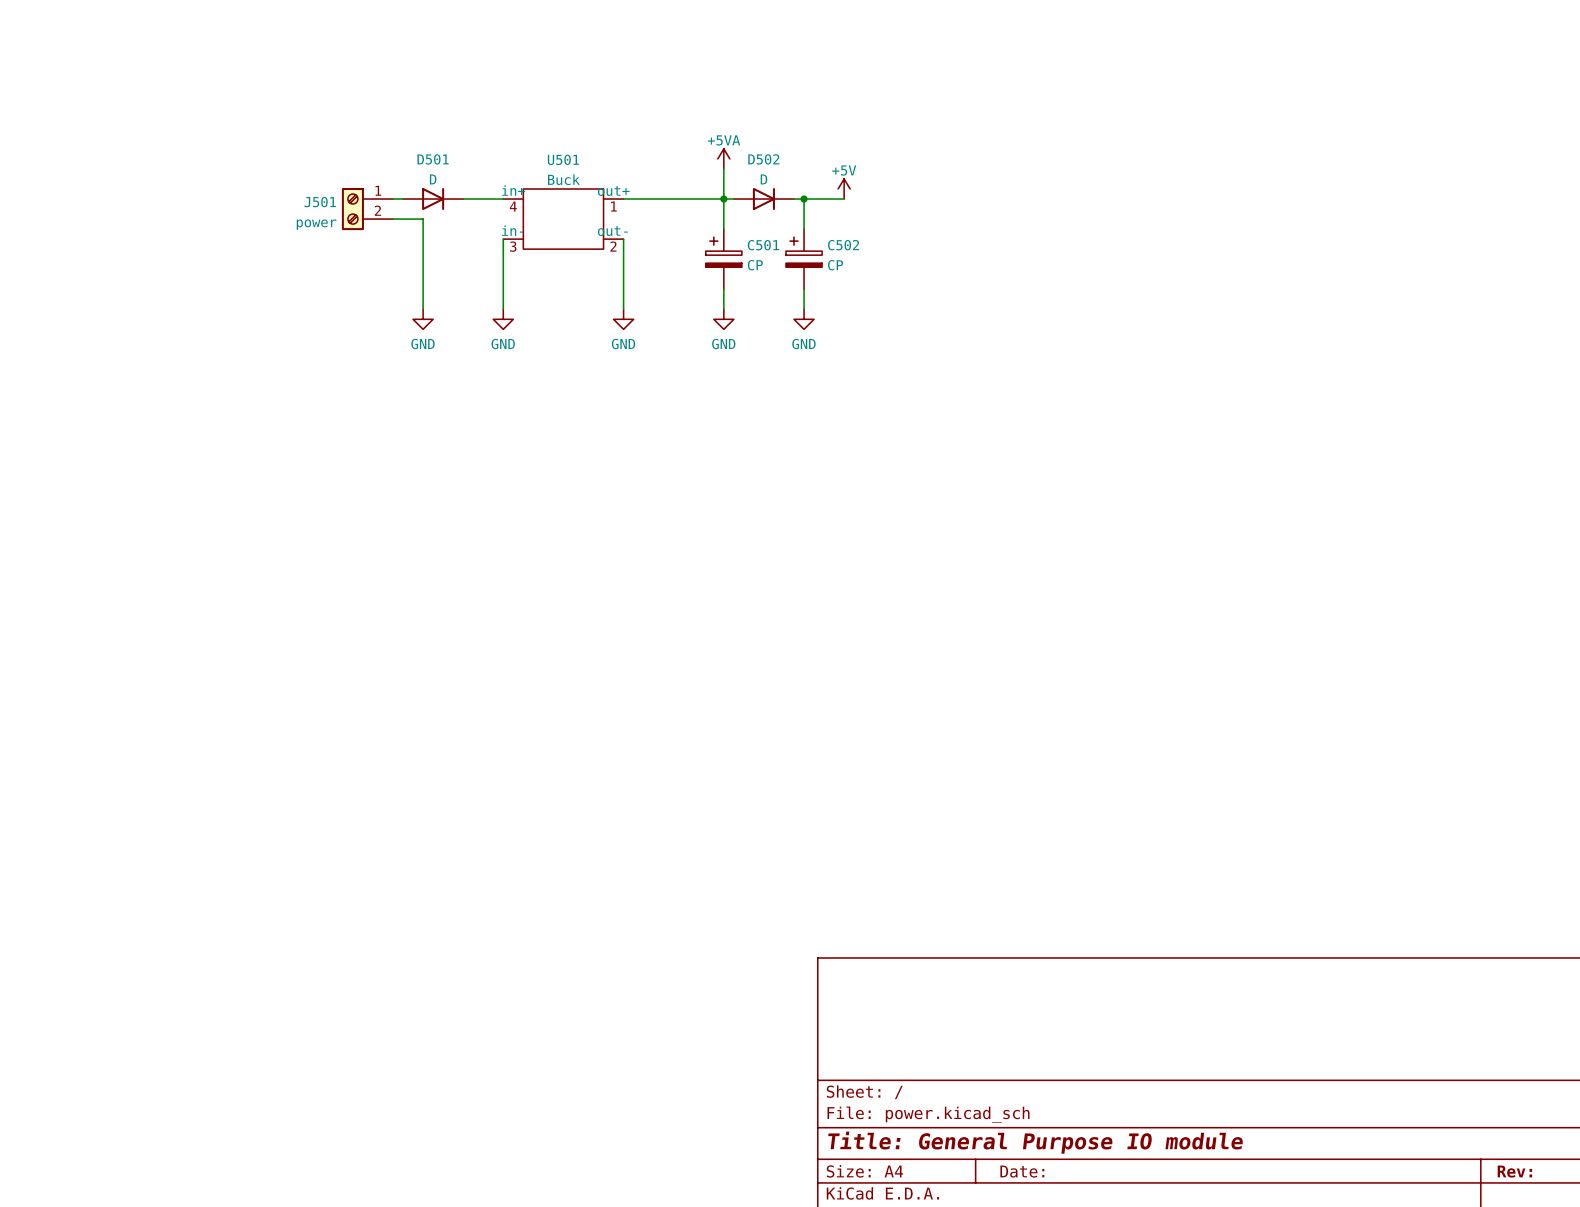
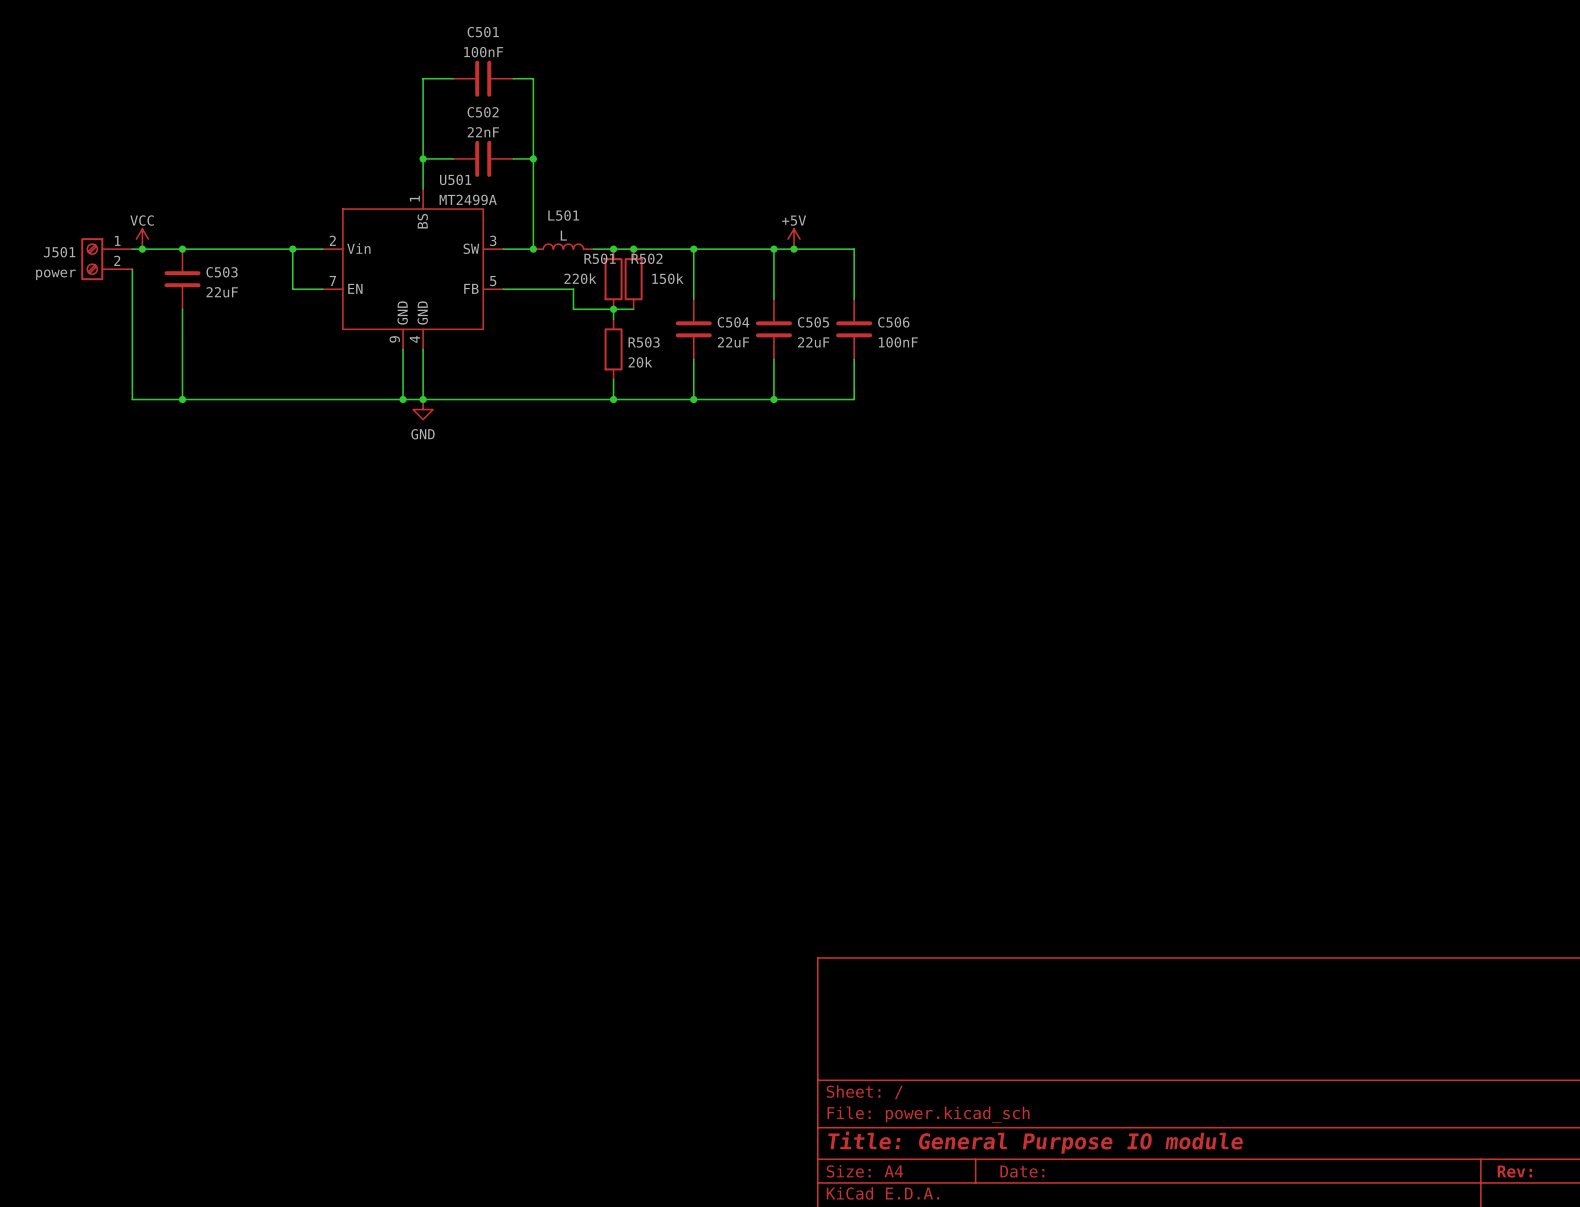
wire: none -> (453, 78) (423, 78) (423, 188)
wire: none -> (513, 78) (533, 78) (533, 249) (503, 249)
wire: none -> (423, 158) (453, 158)
junction: none -> (423, 158)
wire: none -> (513, 158) (533, 158)
junction: none -> (533, 158)
power symbol: +5VA (723, 158) -> none
U501 name position: U501 (563, 159) -> U501 (455, 179)
wire: (723, 168) (723, 229) -> none
U501 value: Buck (563, 179) -> MT2499A (468, 199)
U501 symbol: [503, 188, 624, 250] -> [322, 188, 504, 350]
power symbol position: +5V (844, 188) -> +5V (794, 239)
wire: (393, 199) (403, 199) -> none
D501: D (433, 199) -> none
wire: (463, 199) (503, 199) -> none
wire: (623, 199) (733, 199) -> none
junction: (723, 199) -> none
D502: D (763, 199) -> none
wire: (794, 199) (844, 199) -> none
wire: (804, 199) (804, 229) -> none
junction: (804, 199) -> none
J501 position: (367, 209) -> (106, 259)
wire: (393, 219) (423, 219) (423, 309) -> none
C501 symbol: [705, 229, 742, 290] -> [453, 60, 514, 97]
C502 symbol: [785, 229, 823, 290] -> [453, 140, 514, 177]
power symbol: none -> VCC (142, 239)
wire: (503, 239) (503, 309) -> none
wire: (623, 239) (623, 309) -> none
C501 name position: C501 (763, 245) -> C501 (483, 32)
C502 name position: C502 (843, 245) -> C502 (483, 112)
L501: none -> L (563, 246)
wire: none -> (132, 249) (322, 249)
junction: none -> (142, 249)
junction: none -> (182, 249)
wire: none -> (292, 249) (292, 289) (322, 289)
junction: none -> (292, 249)
junction: none -> (533, 249)
wire: none -> (593, 249) (854, 249) (854, 299)
junction: none -> (613, 249)
junction: none -> (633, 249)
wire: none -> (693, 249) (693, 299)
junction: none -> (693, 249)
wire: none -> (773, 249) (773, 299)
junction: none -> (773, 249)
junction: none -> (794, 249)
C501 value: CP (755, 265) -> 100nF (483, 52)
C502 value: CP (835, 265) -> 22nF (483, 132)
wire: none -> (132, 269) (132, 399) (854, 399) (854, 359)
C503: none -> 22uF (182, 279)
R501: none -> 220k (613, 279)
R502: none -> 150k (633, 279)
wire: none -> (503, 289) (573, 289) (573, 309) (633, 309)
wire: (723, 289) (723, 309) -> (613, 379) (613, 399)
wire: (804, 289) (804, 309) -> none
wire: none -> (182, 309) (182, 399)
wire: none -> (613, 309) (613, 319)
junction: none -> (613, 309)
power symbol: GND (423, 319) -> none
power symbol: GND (503, 319) -> none
power symbol: GND (623, 319) -> none
power symbol: GND (723, 319) -> none
power symbol: GND (804, 319) -> none
C504: none -> 22uF (693, 329)
C505: none -> 22uF (773, 329)
C506: none -> 100nF (854, 329)
wire: none -> (403, 349) (403, 399)
wire: none -> (423, 349) (423, 399)
R503: none -> 20k (613, 349)
wire: none -> (693, 359) (693, 399)
wire: none -> (773, 359) (773, 399)
junction: none -> (182, 399)
junction: none -> (403, 399)
junction: none -> (423, 399)
junction: none -> (613, 399)
junction: none -> (693, 399)
junction: none -> (773, 399)
power symbol: none -> GND (423, 409)

